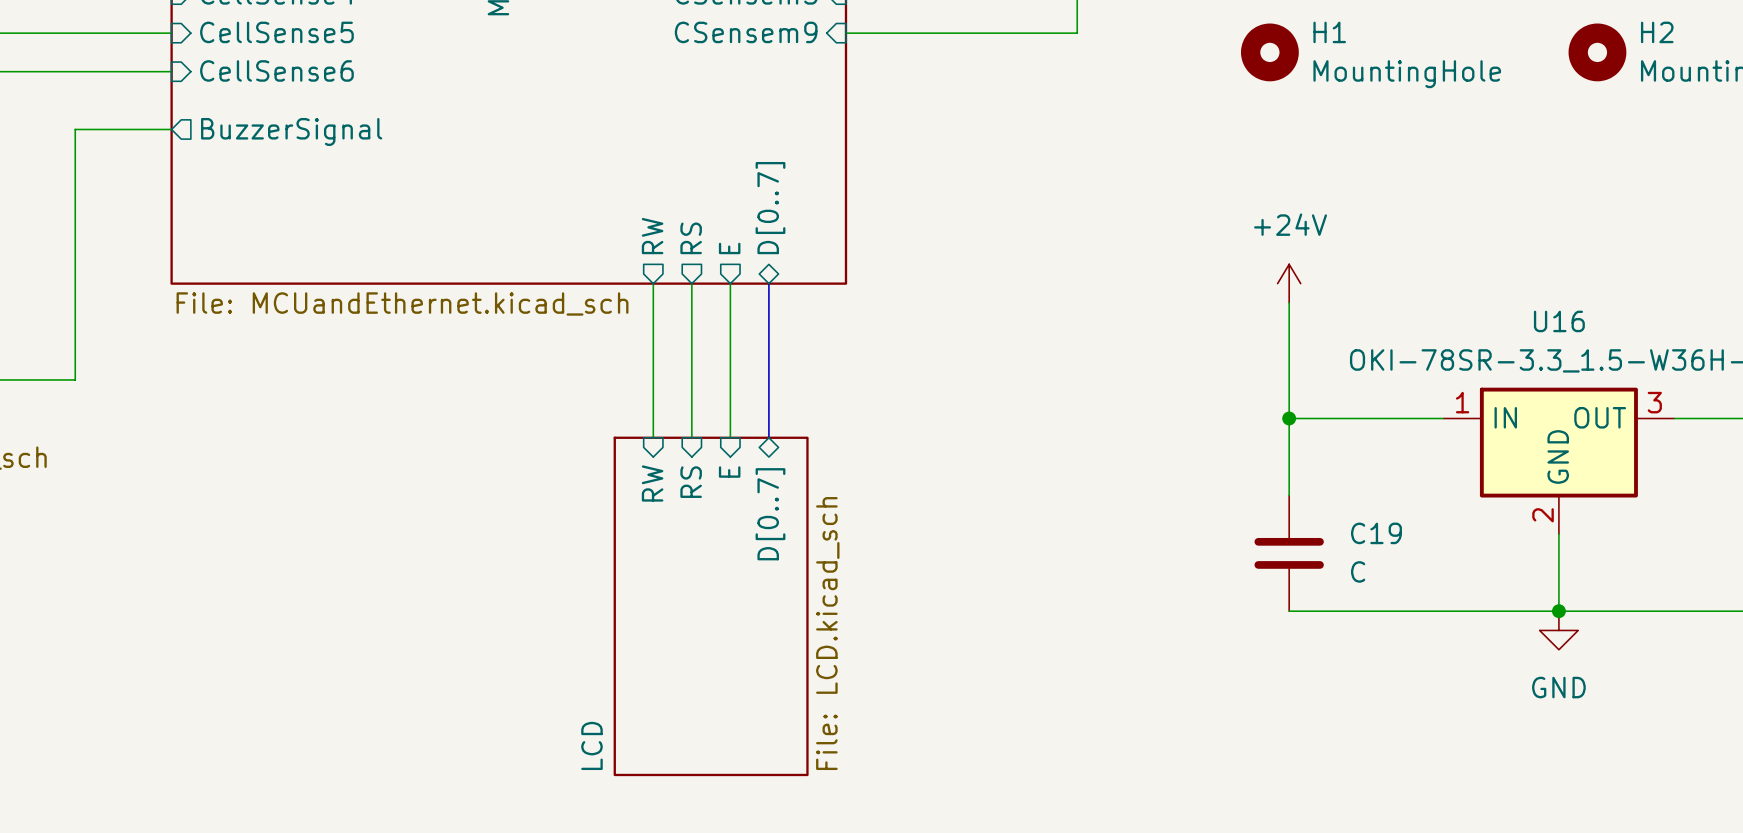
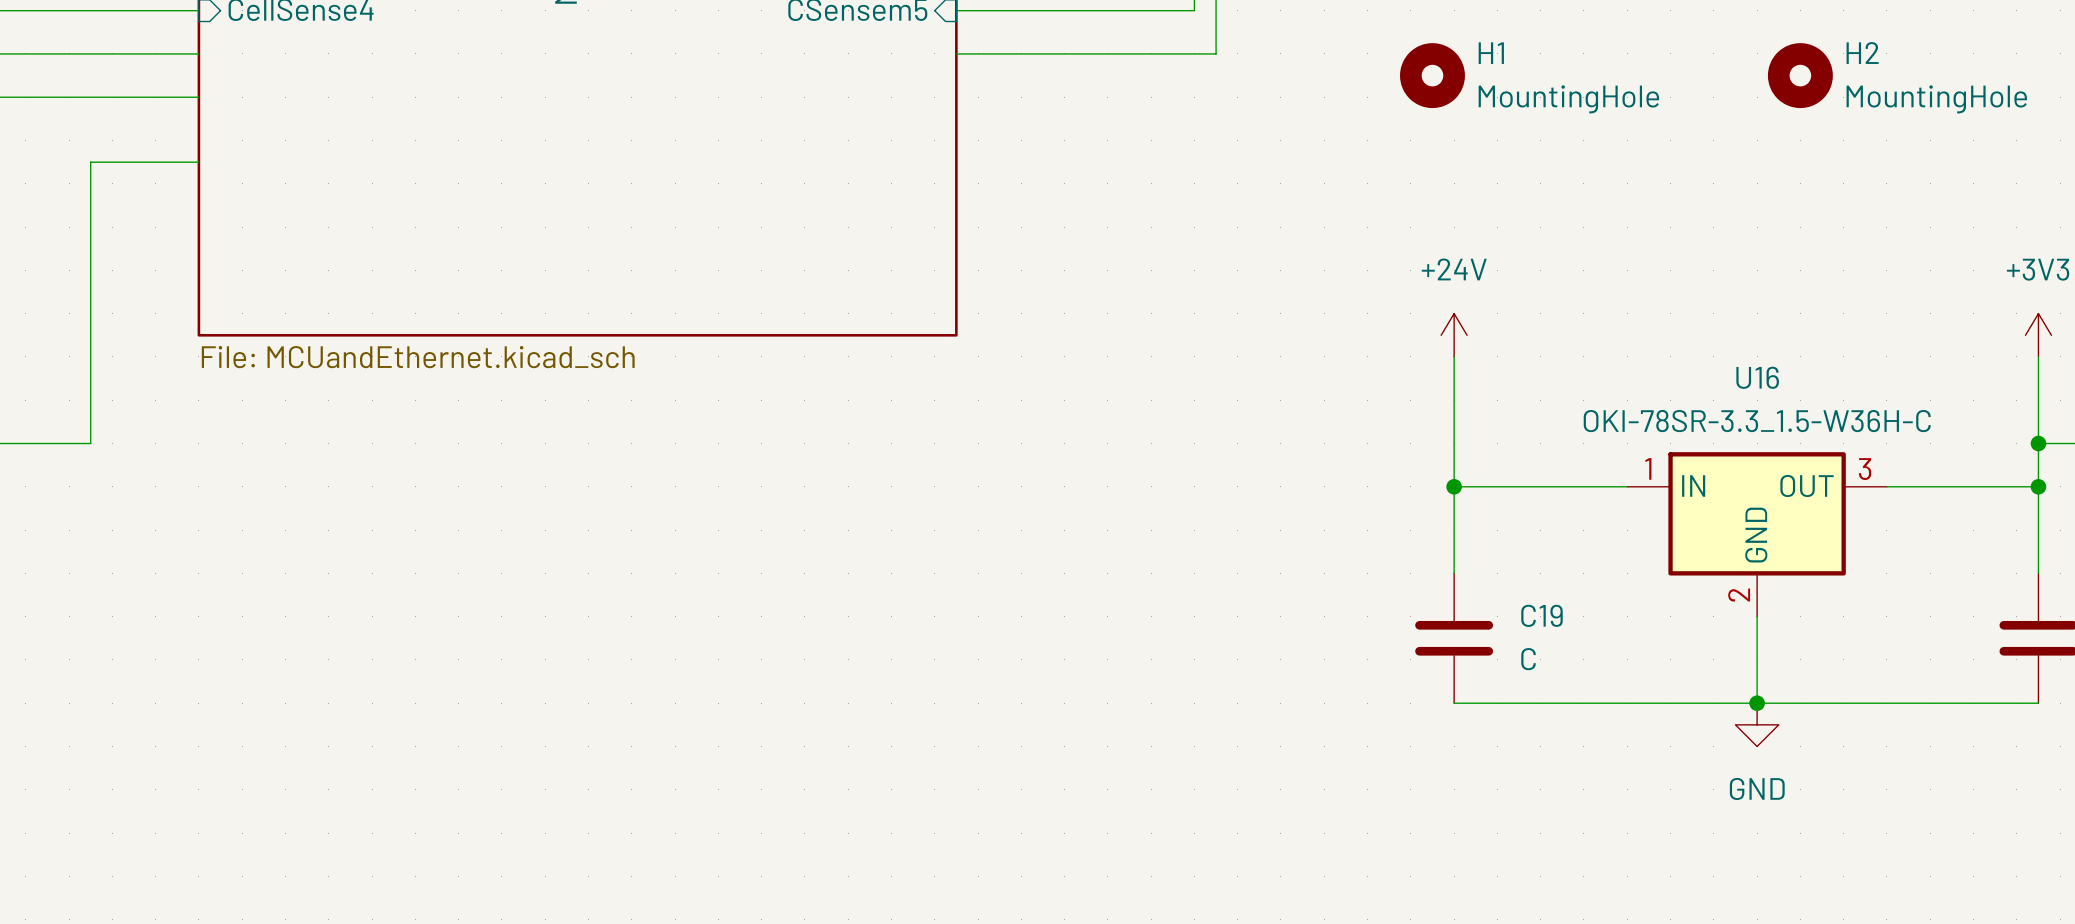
sheet pin: CellSense5 (276, 32) -> none
sheet pin: CSensem9 (746, 32) -> none
sheet pin: CellSense6 (276, 70) -> none
sheet pin: BuzzerSignal (291, 131) -> none
sheet pin: D[0..7] (770, 208) -> none
sheet pin: RW (652, 236) -> none
sheet pin: RS (691, 238) -> none
sheet pin: E (729, 248) -> none
wire: (653, 283) (653, 437) -> none
wire: (691, 283) (691, 437) -> none
wire: (730, 283) (730, 437) -> none
bus: (768, 283) (768, 437) -> none
sheet pin: E (729, 472) -> none
sheet pin: RS (691, 482) -> none
sheet pin: RW (652, 483) -> none
sheet pin: D[0..7] (770, 514) -> none
sheet LCD: File: LCD.kicad_sch (711, 606) -> none

